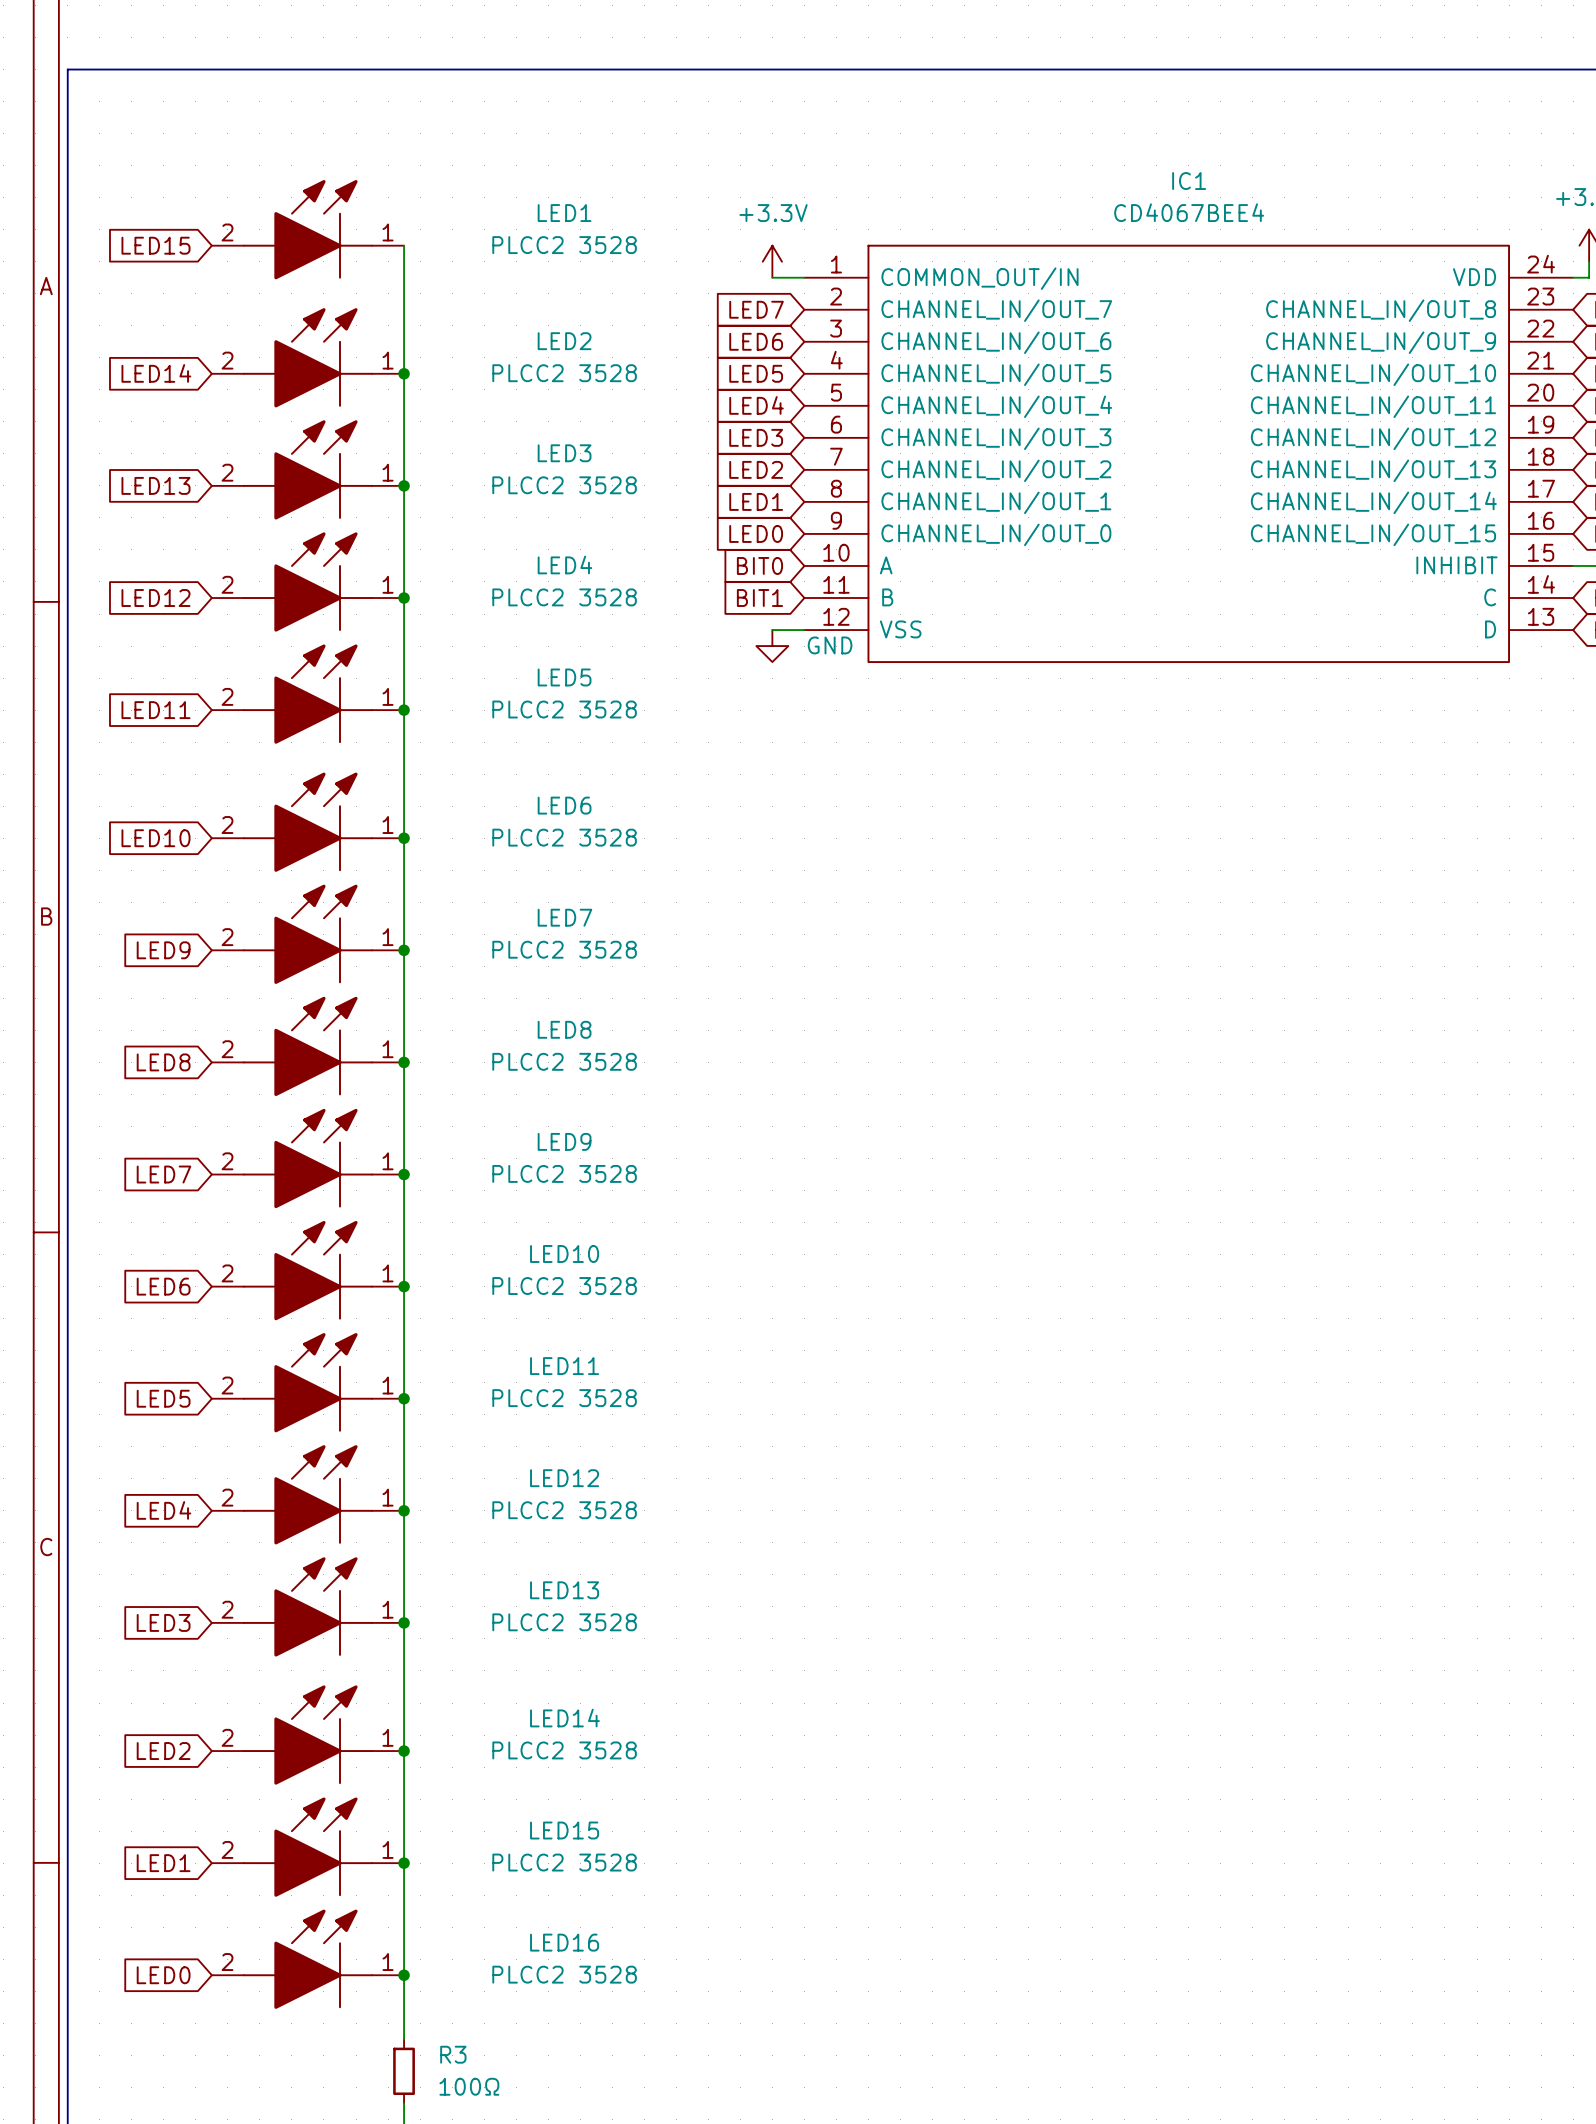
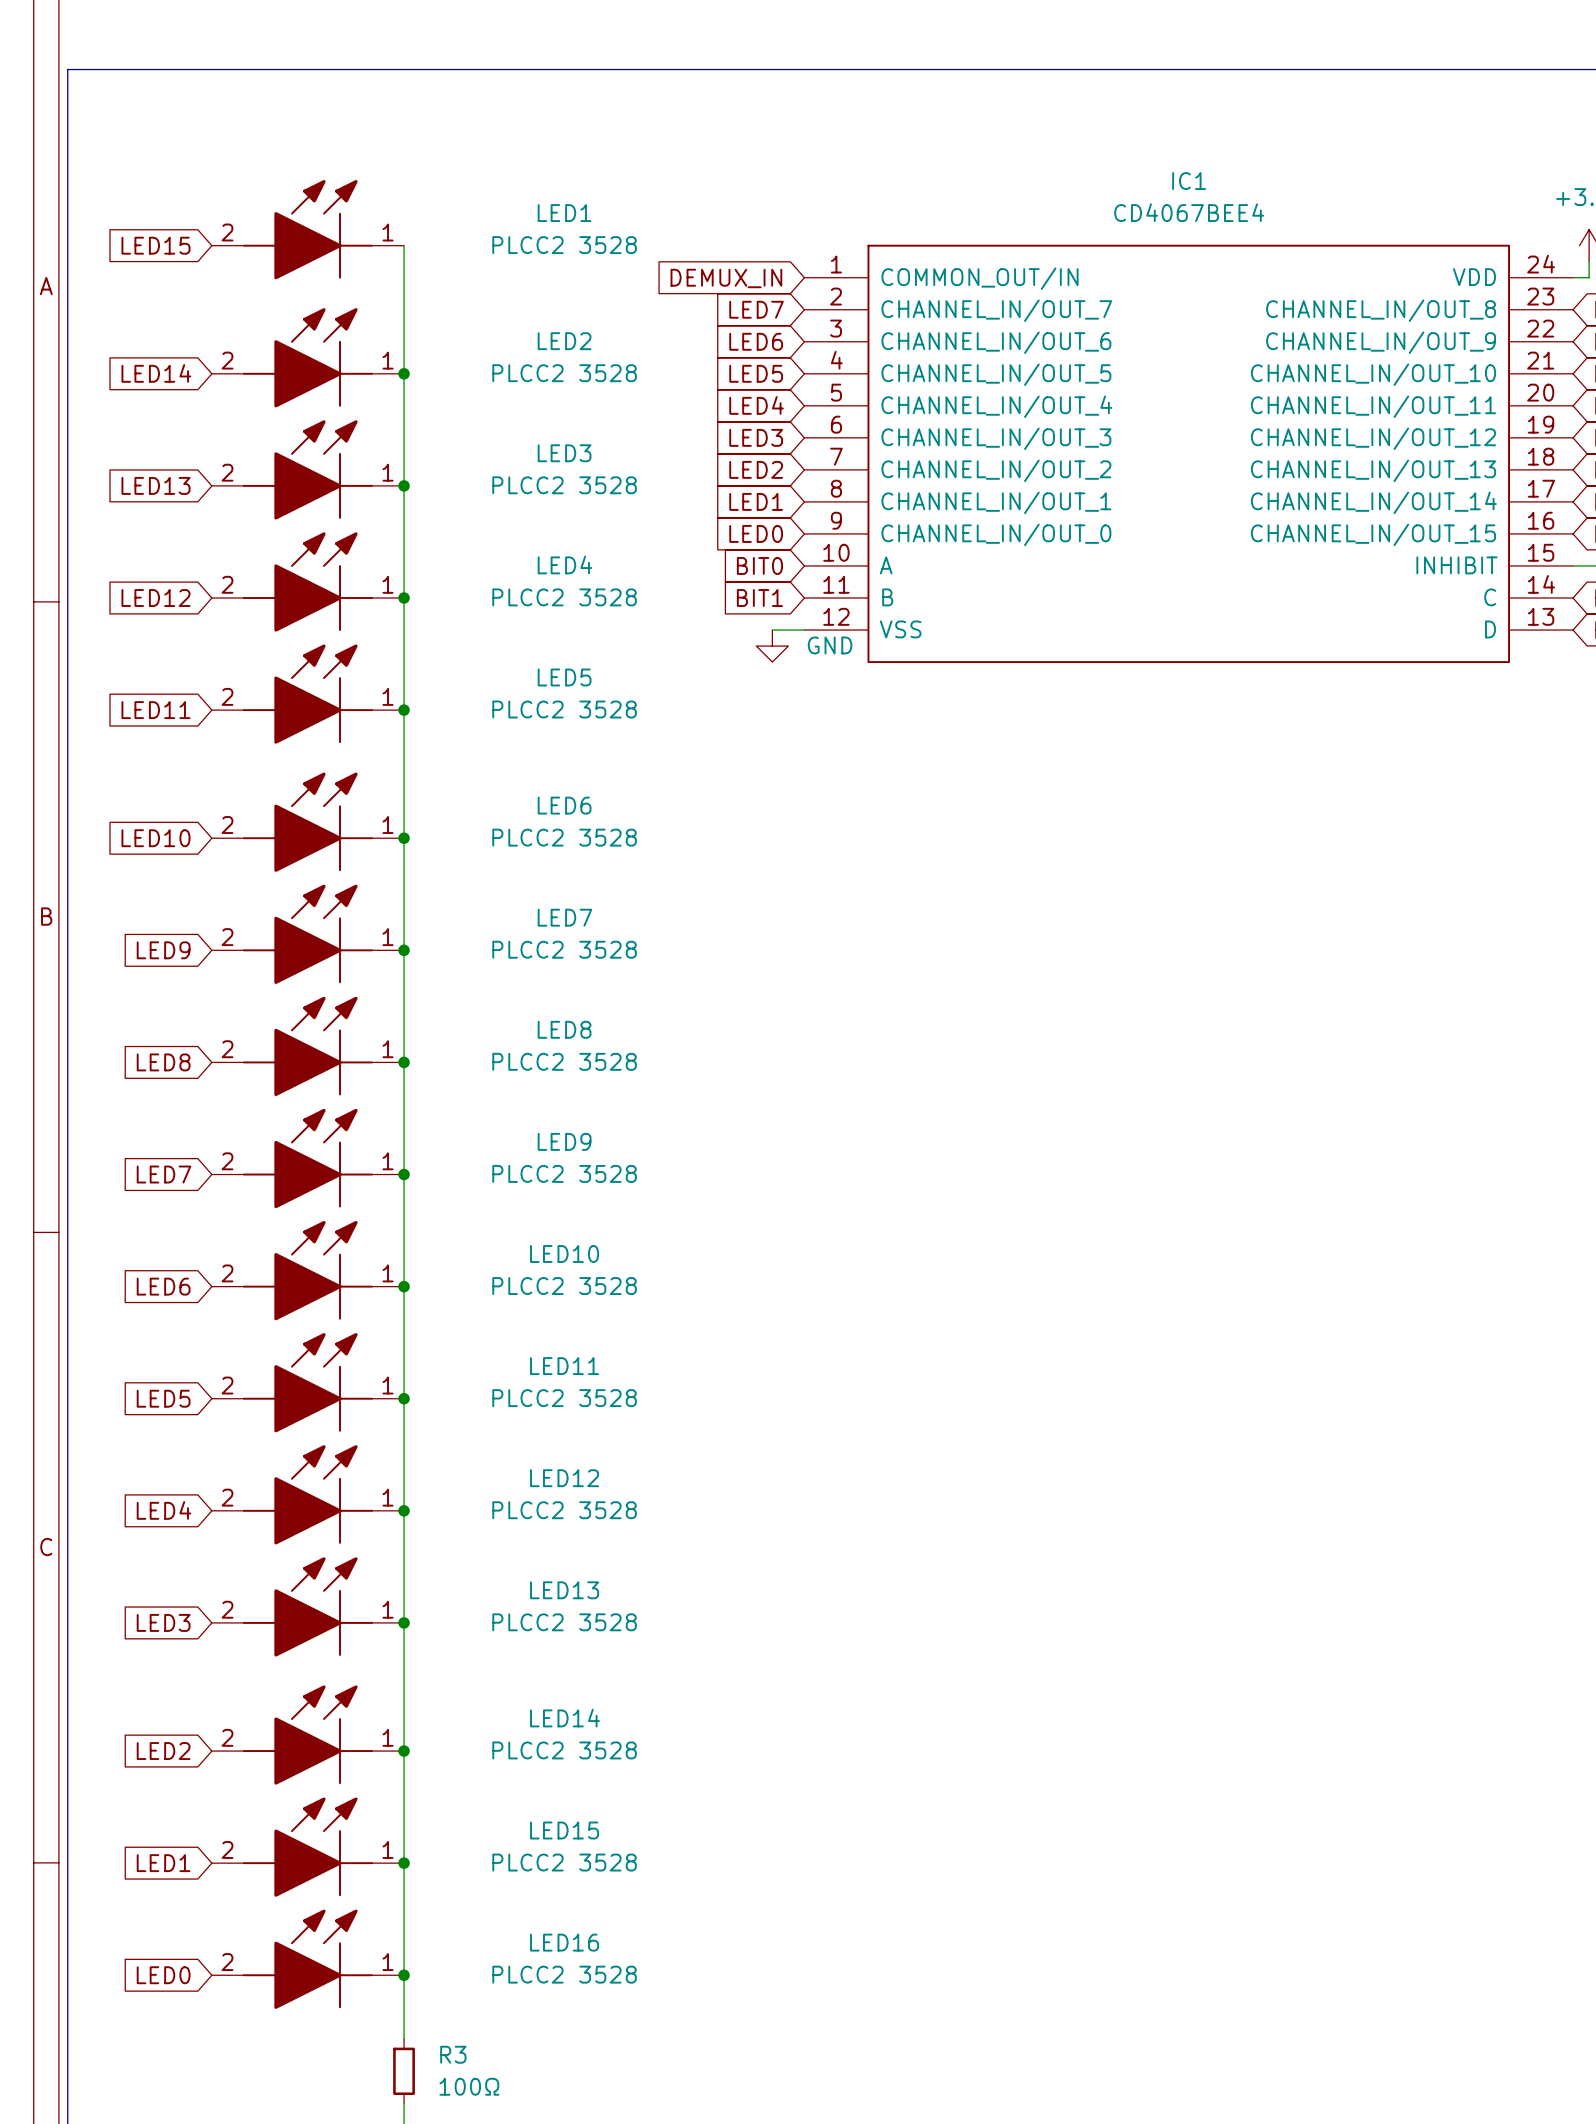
power symbol: +3.3V (772, 261) -> none
wire: (772, 277) (804, 277) -> none
global label: none -> DEMUX_IN (726, 278)

